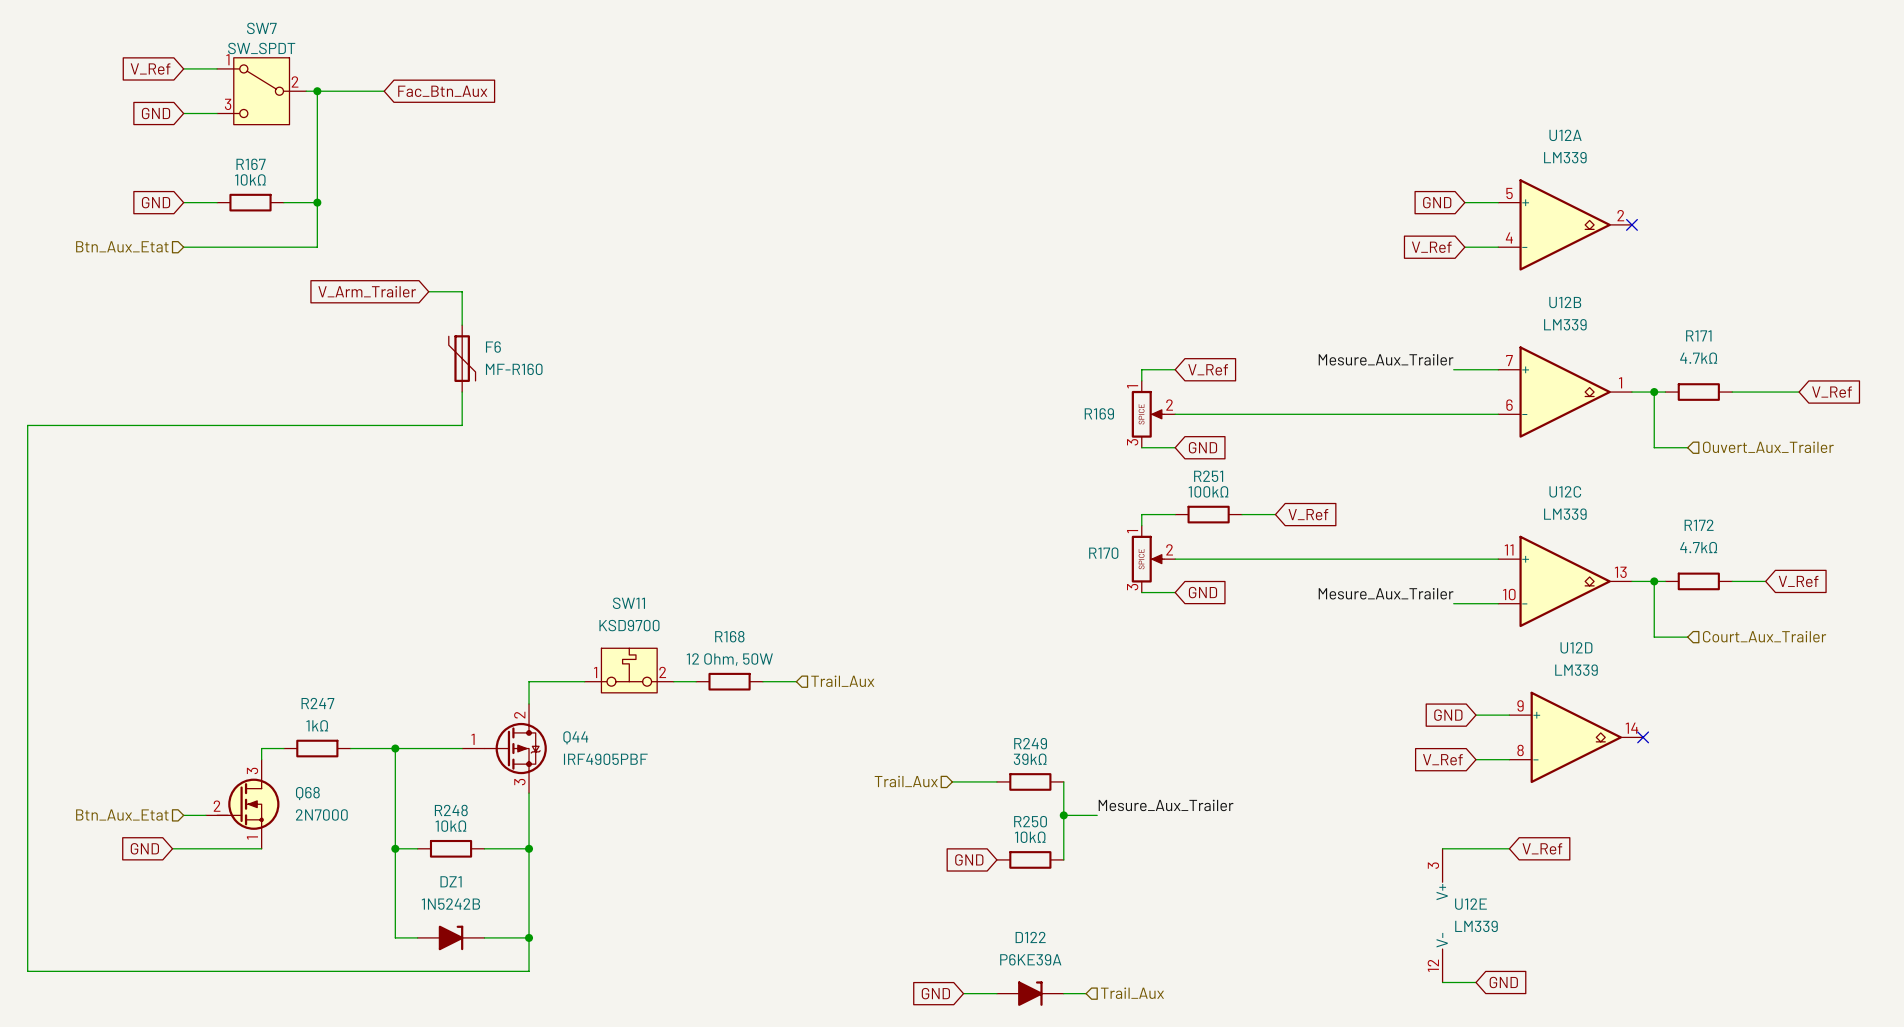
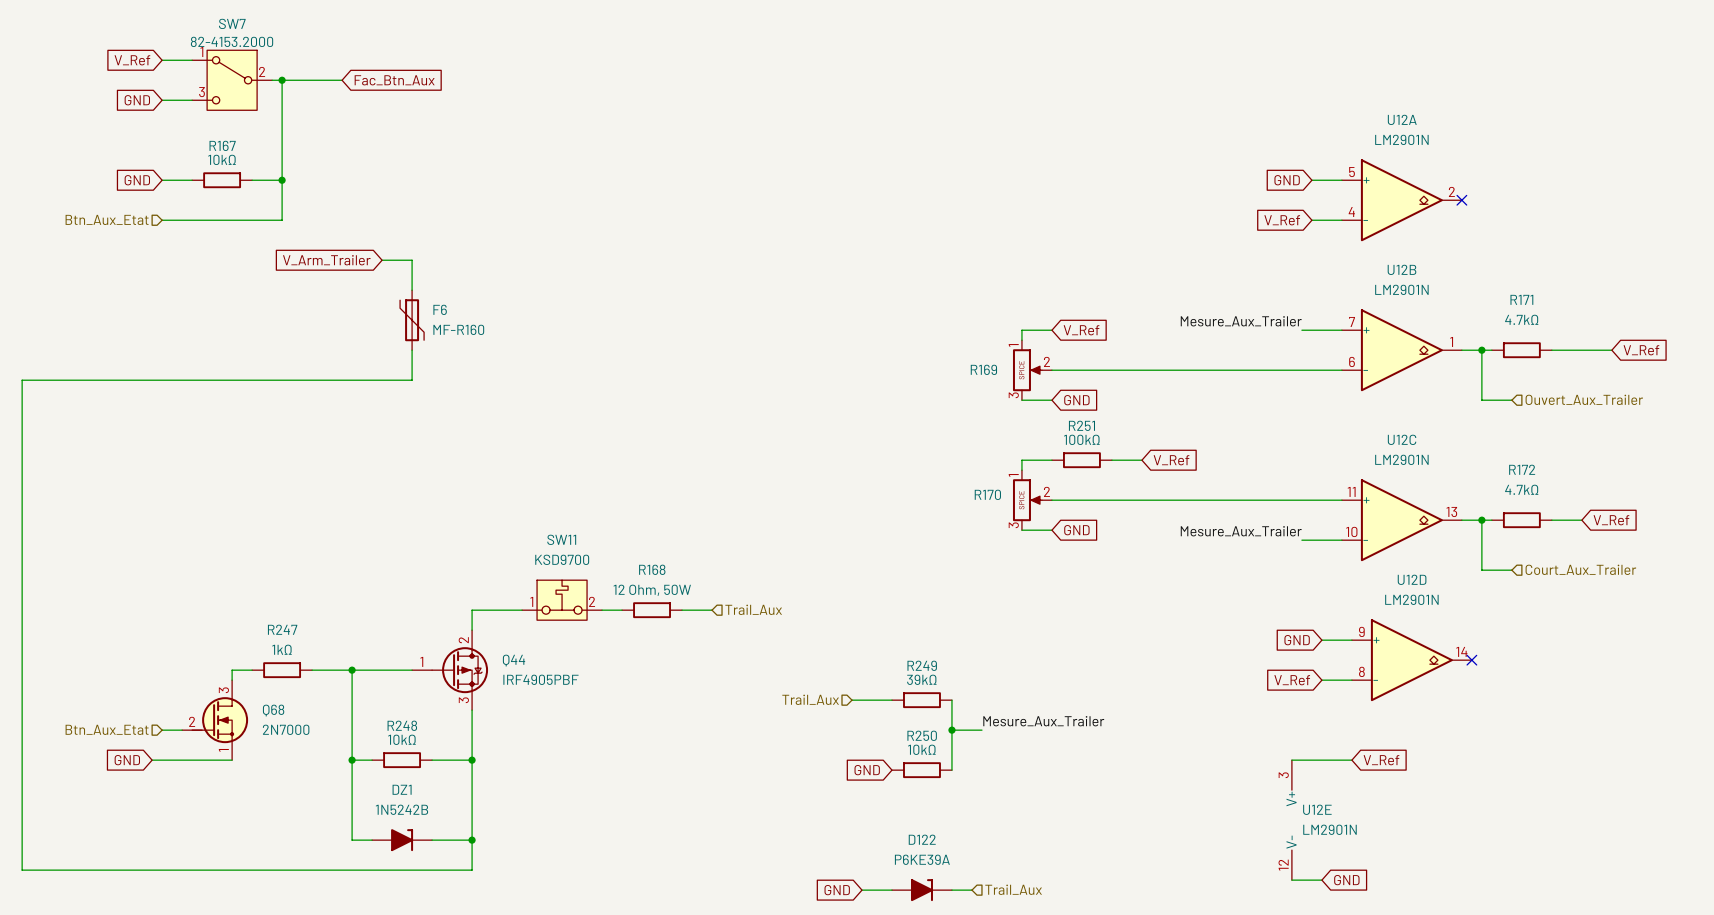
SW7 value: SW_SPDT (261, 48) -> 82-4153.2000 (232, 41)
U12A value: LM339 (1565, 157) -> LM2901N (1401, 139)
U12B value: LM339 (1565, 324) -> LM2901N (1401, 289)
U12C value: LM339 (1565, 514) -> LM2901N (1401, 459)
U12D value: LM339 (1576, 670) -> LM2901N (1411, 599)
U12E value: LM339 (1476, 926) -> LM2901N (1329, 829)

